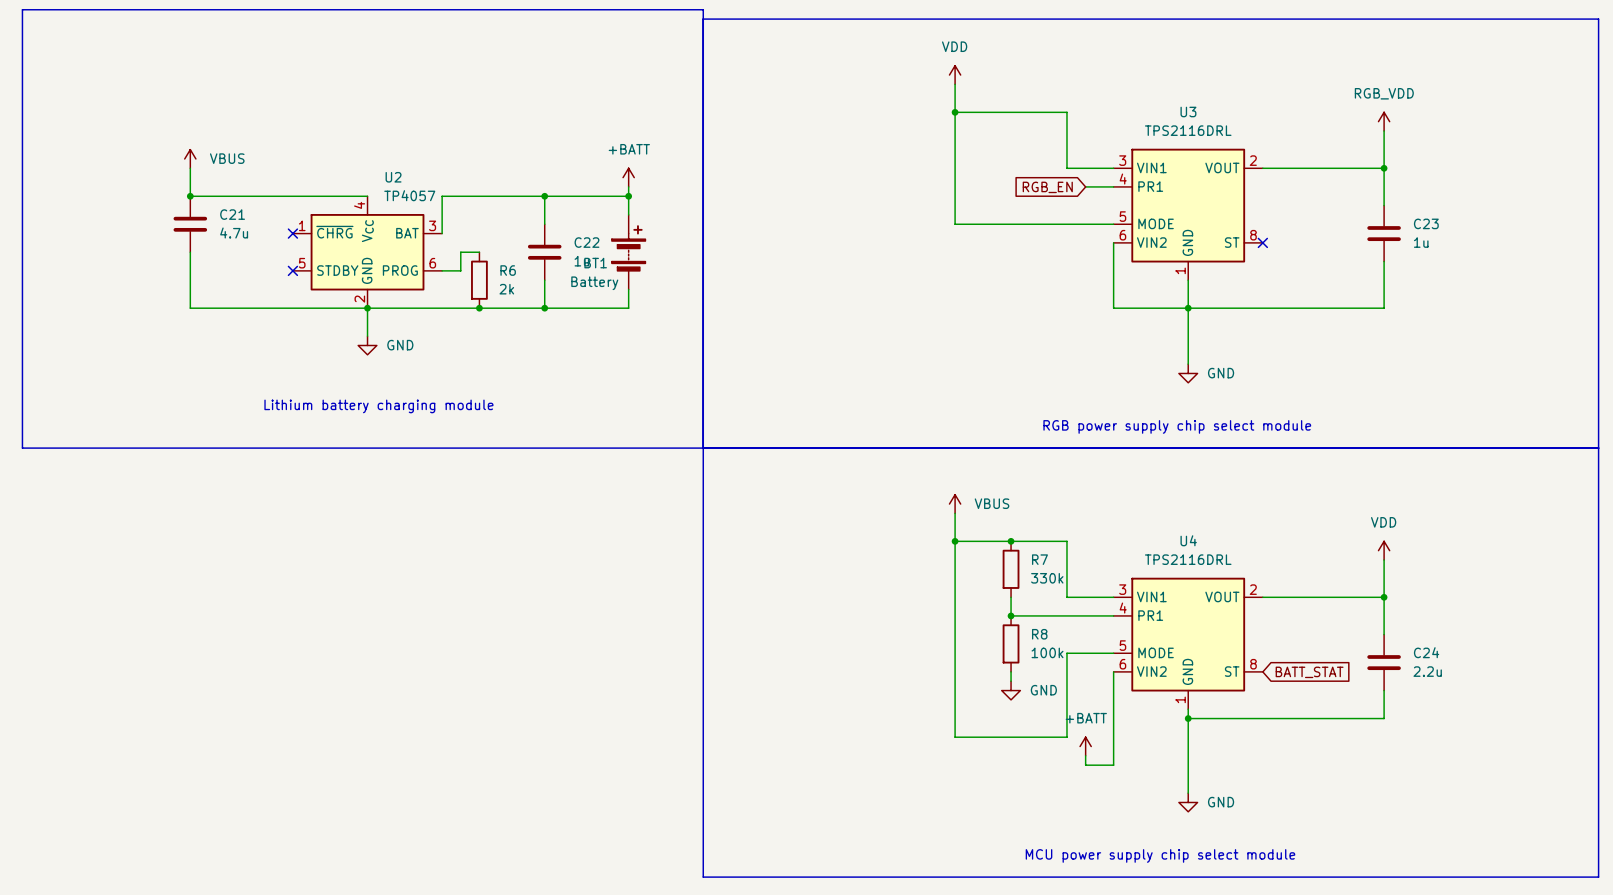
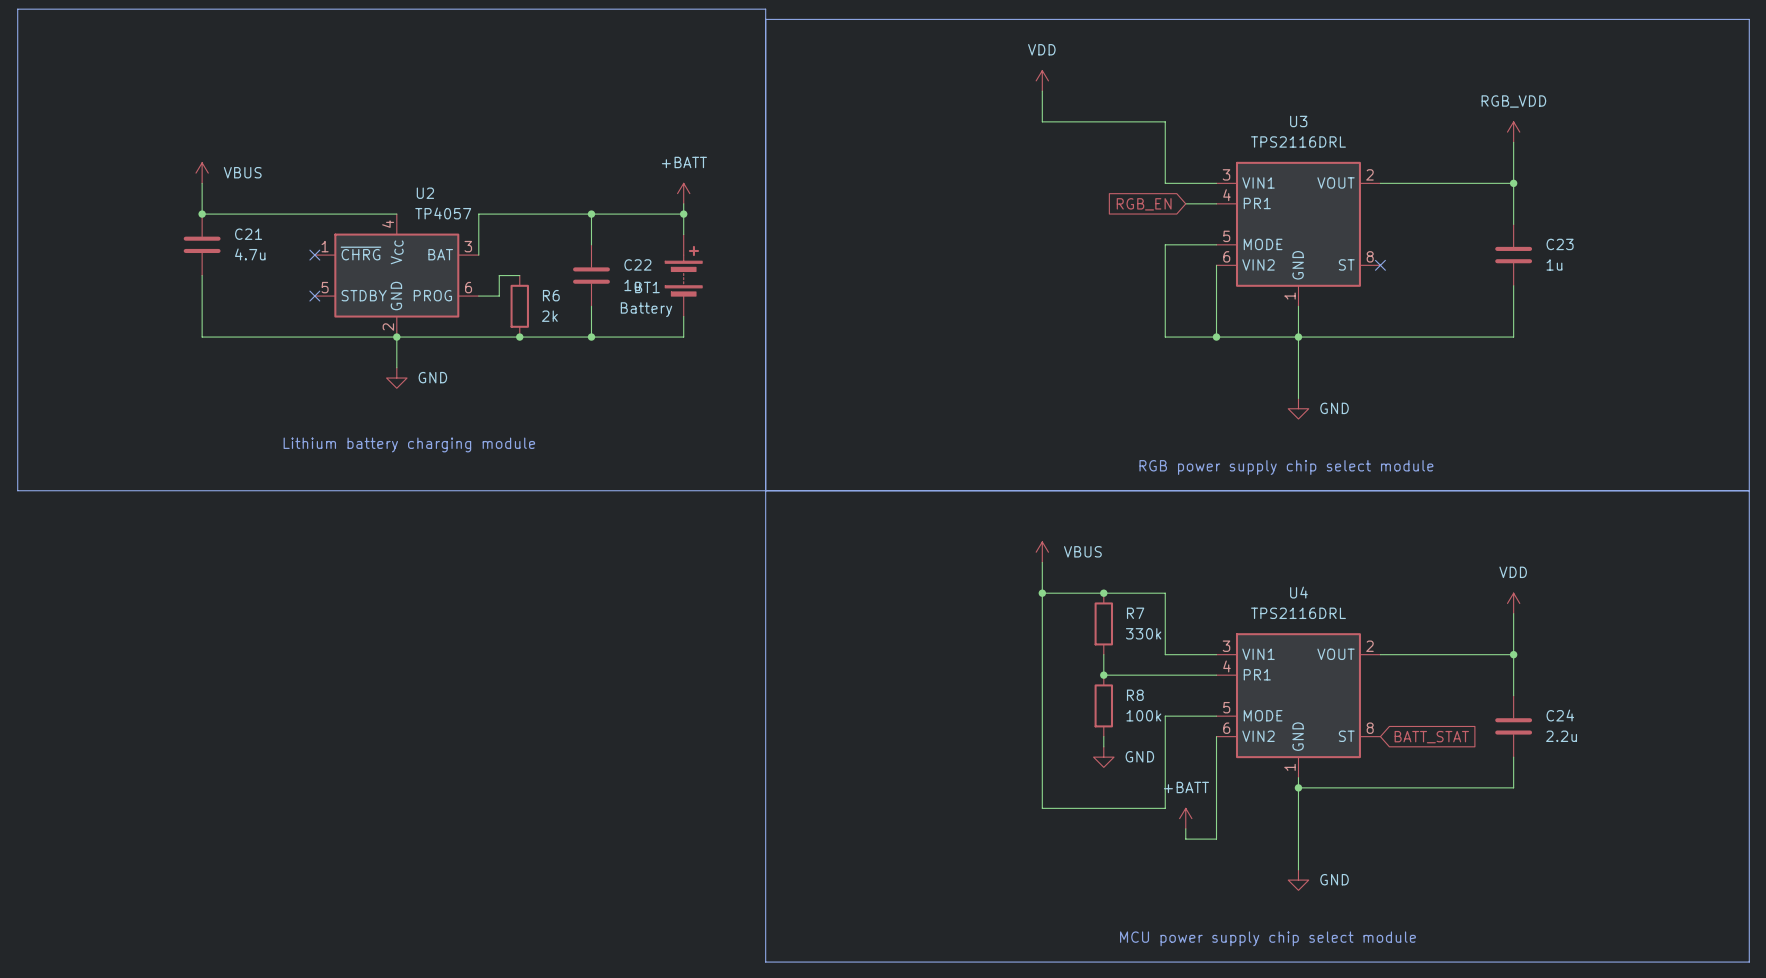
wire: (955, 112) (955, 224) (1066, 224) -> (1216, 337) (1165, 337) (1165, 244)
junction: (955, 112) -> none
junction: none -> (1216, 337)

